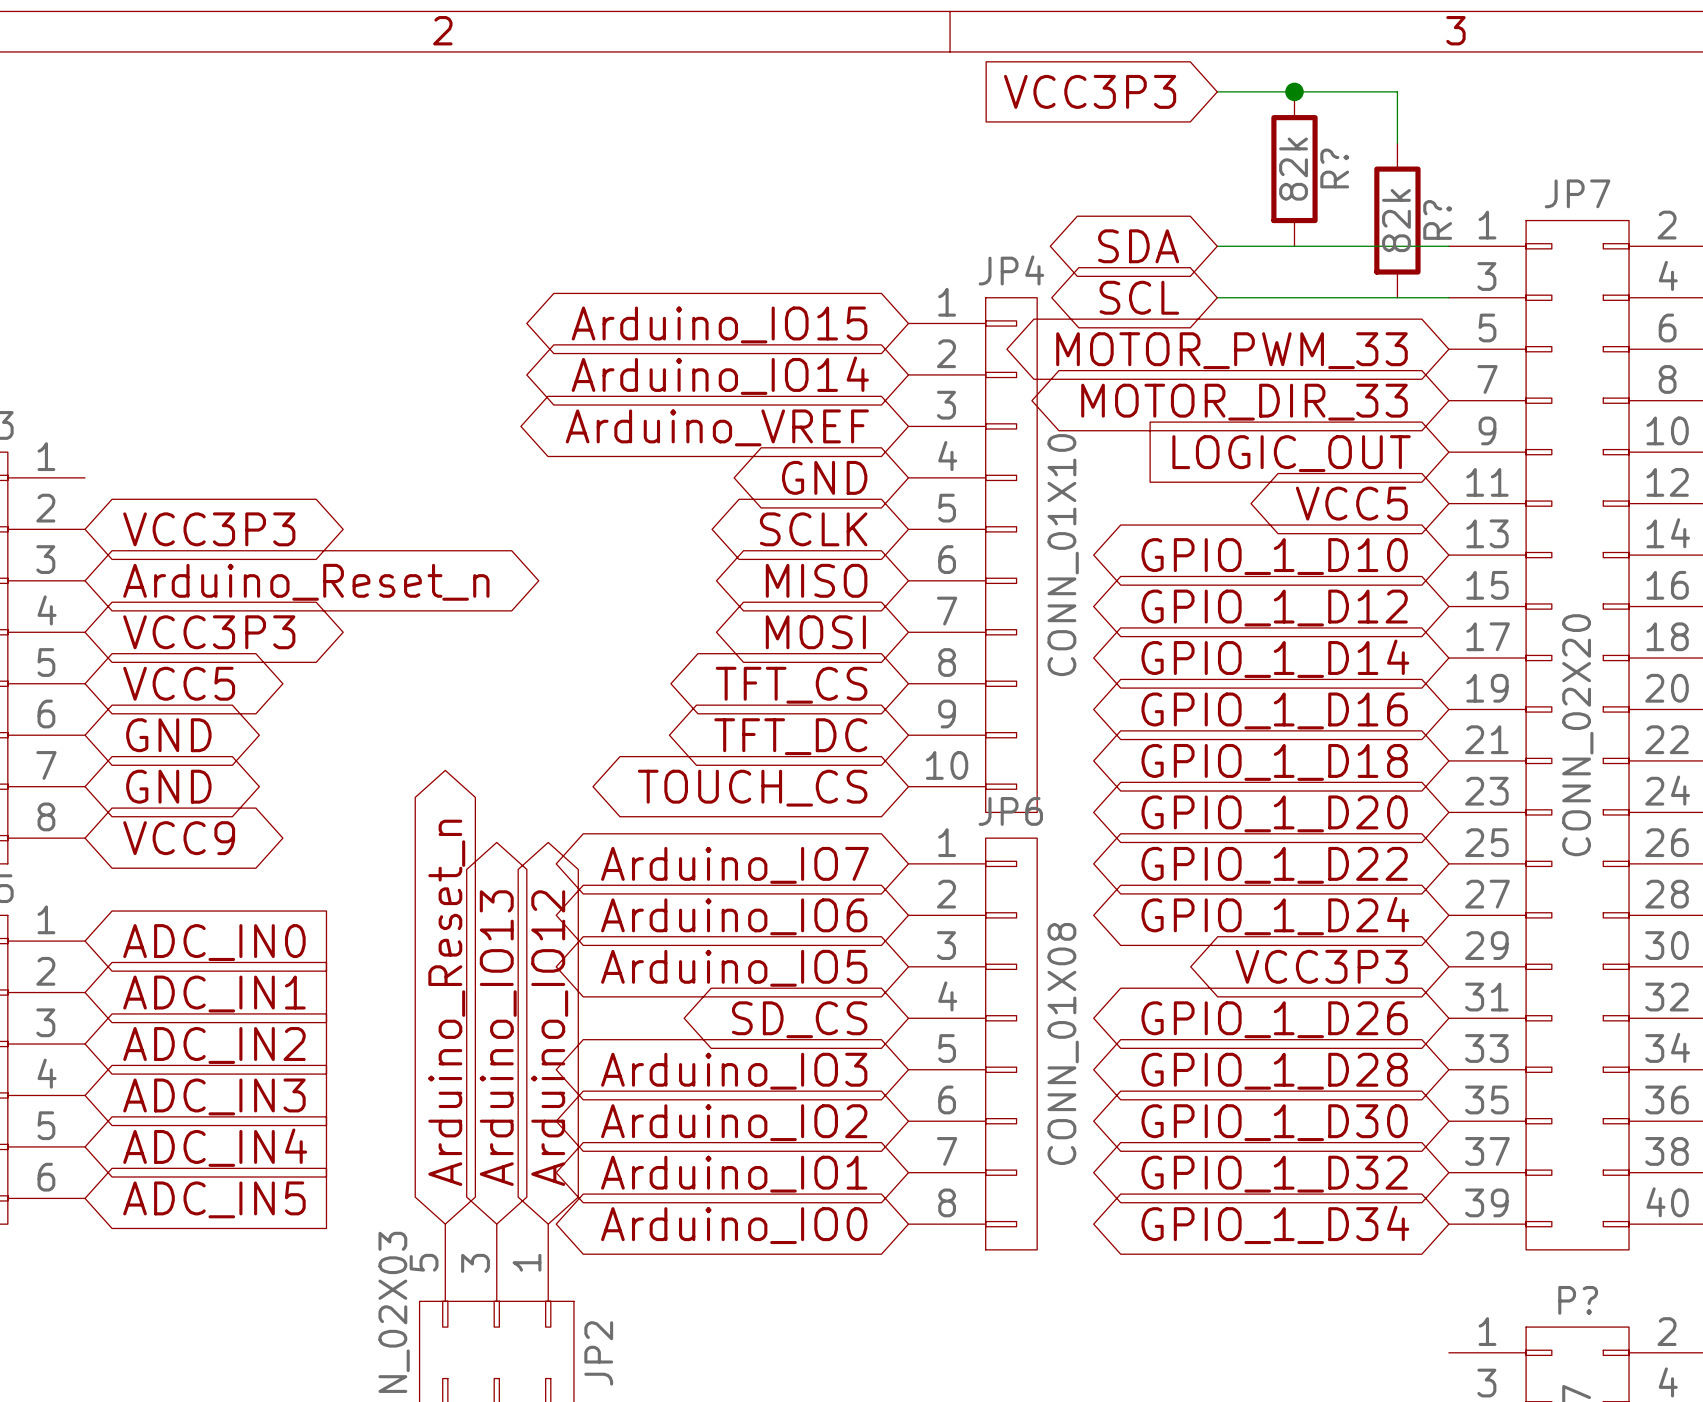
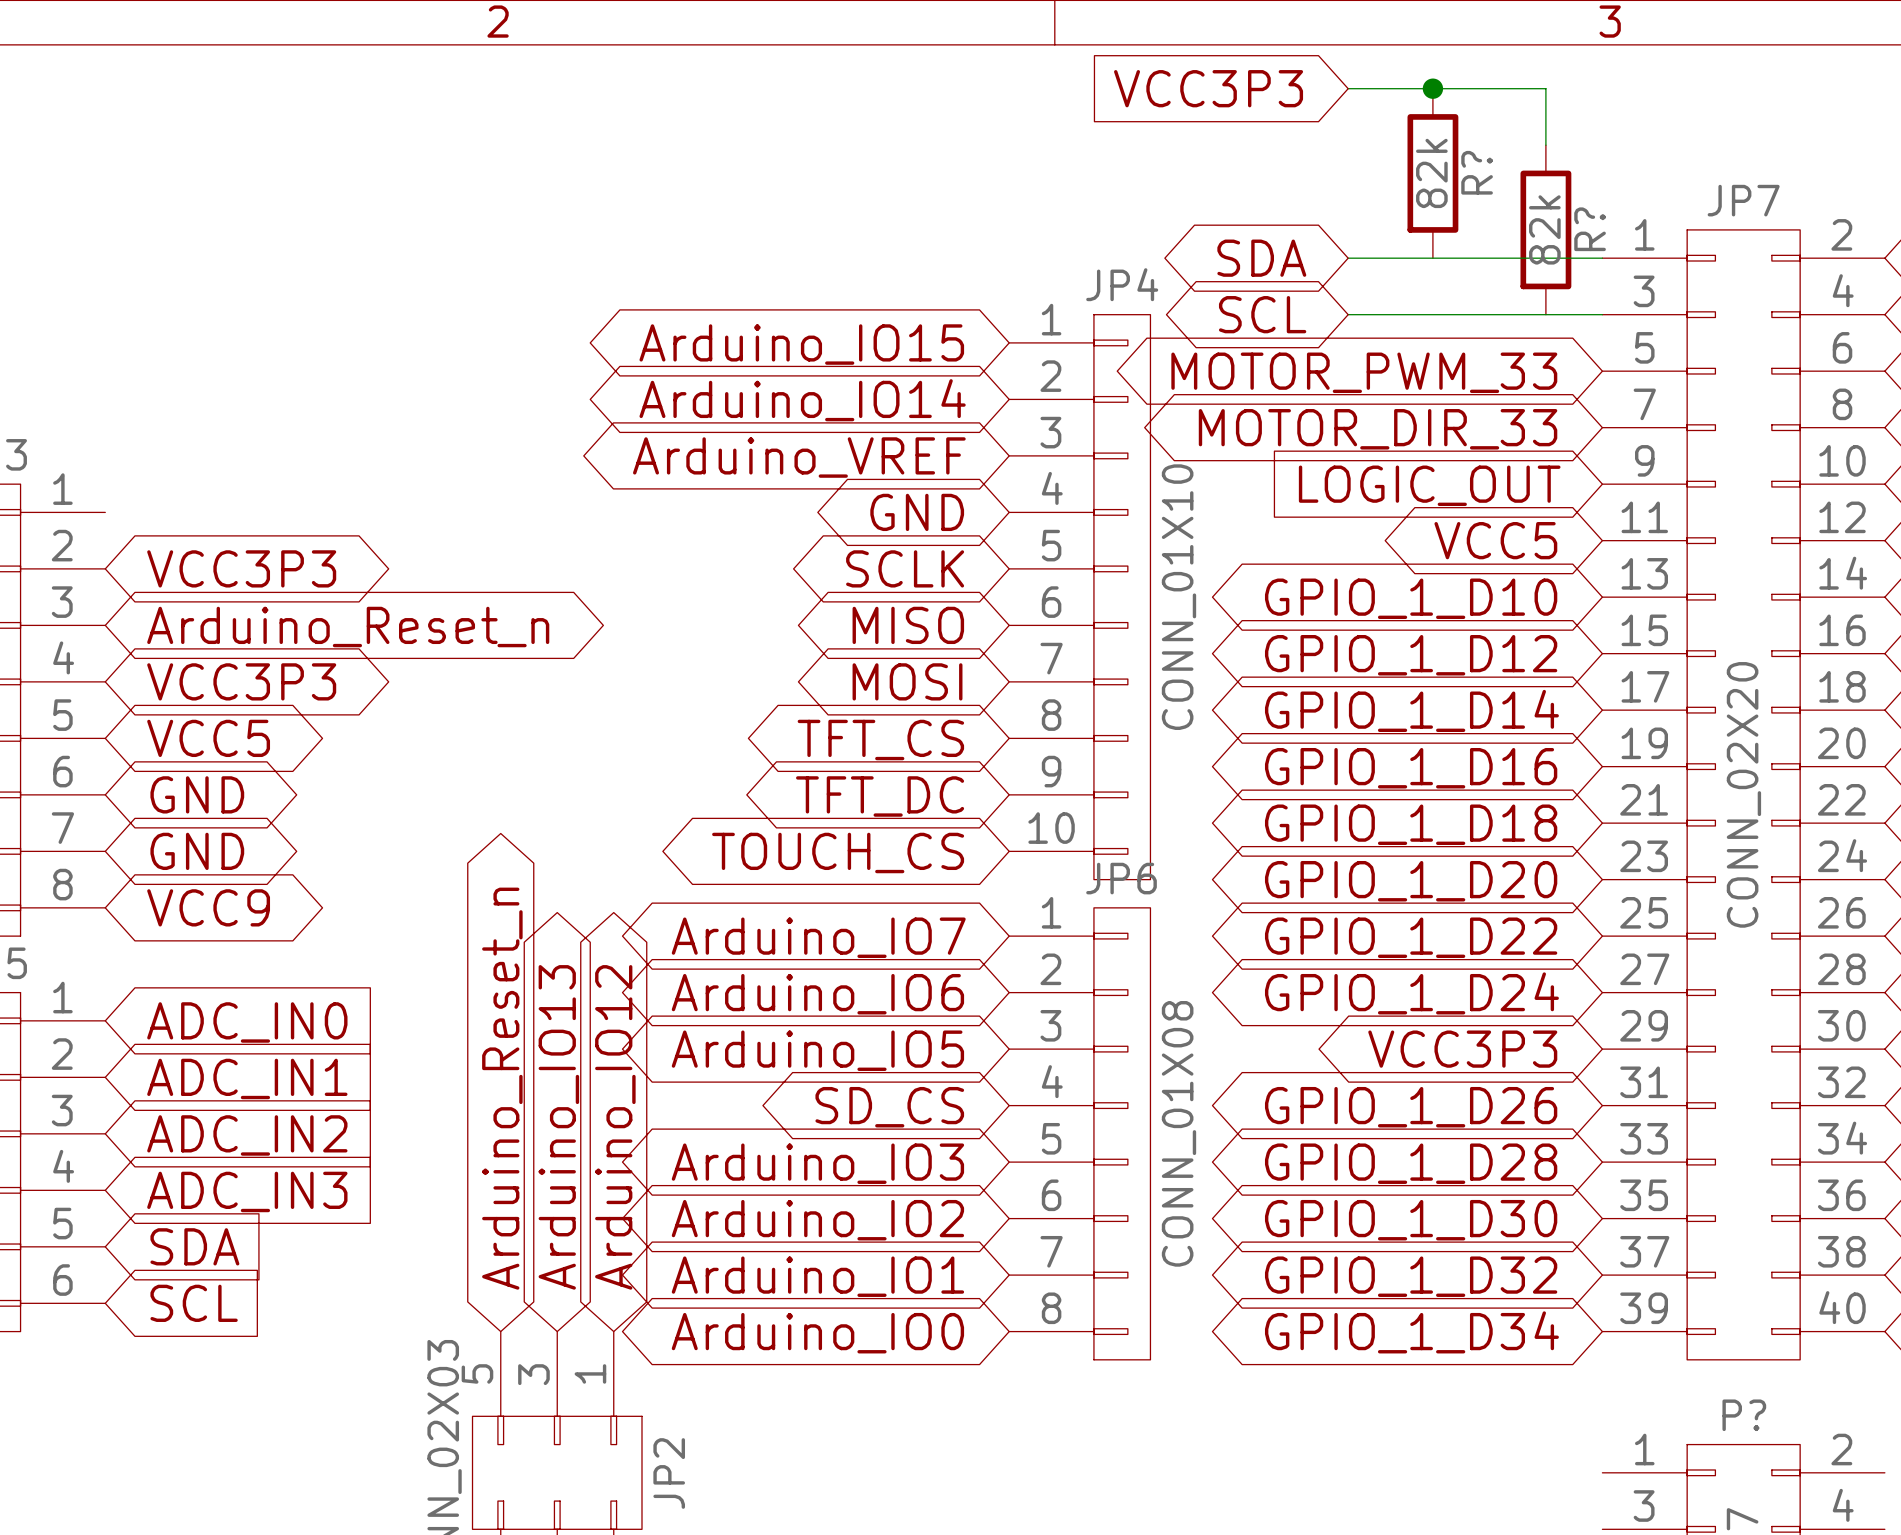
global label: ADC_IN4 (215, 1147) -> SDA (194, 1246)
global label: ADC_IN5 (214, 1199) -> SCL (194, 1303)

